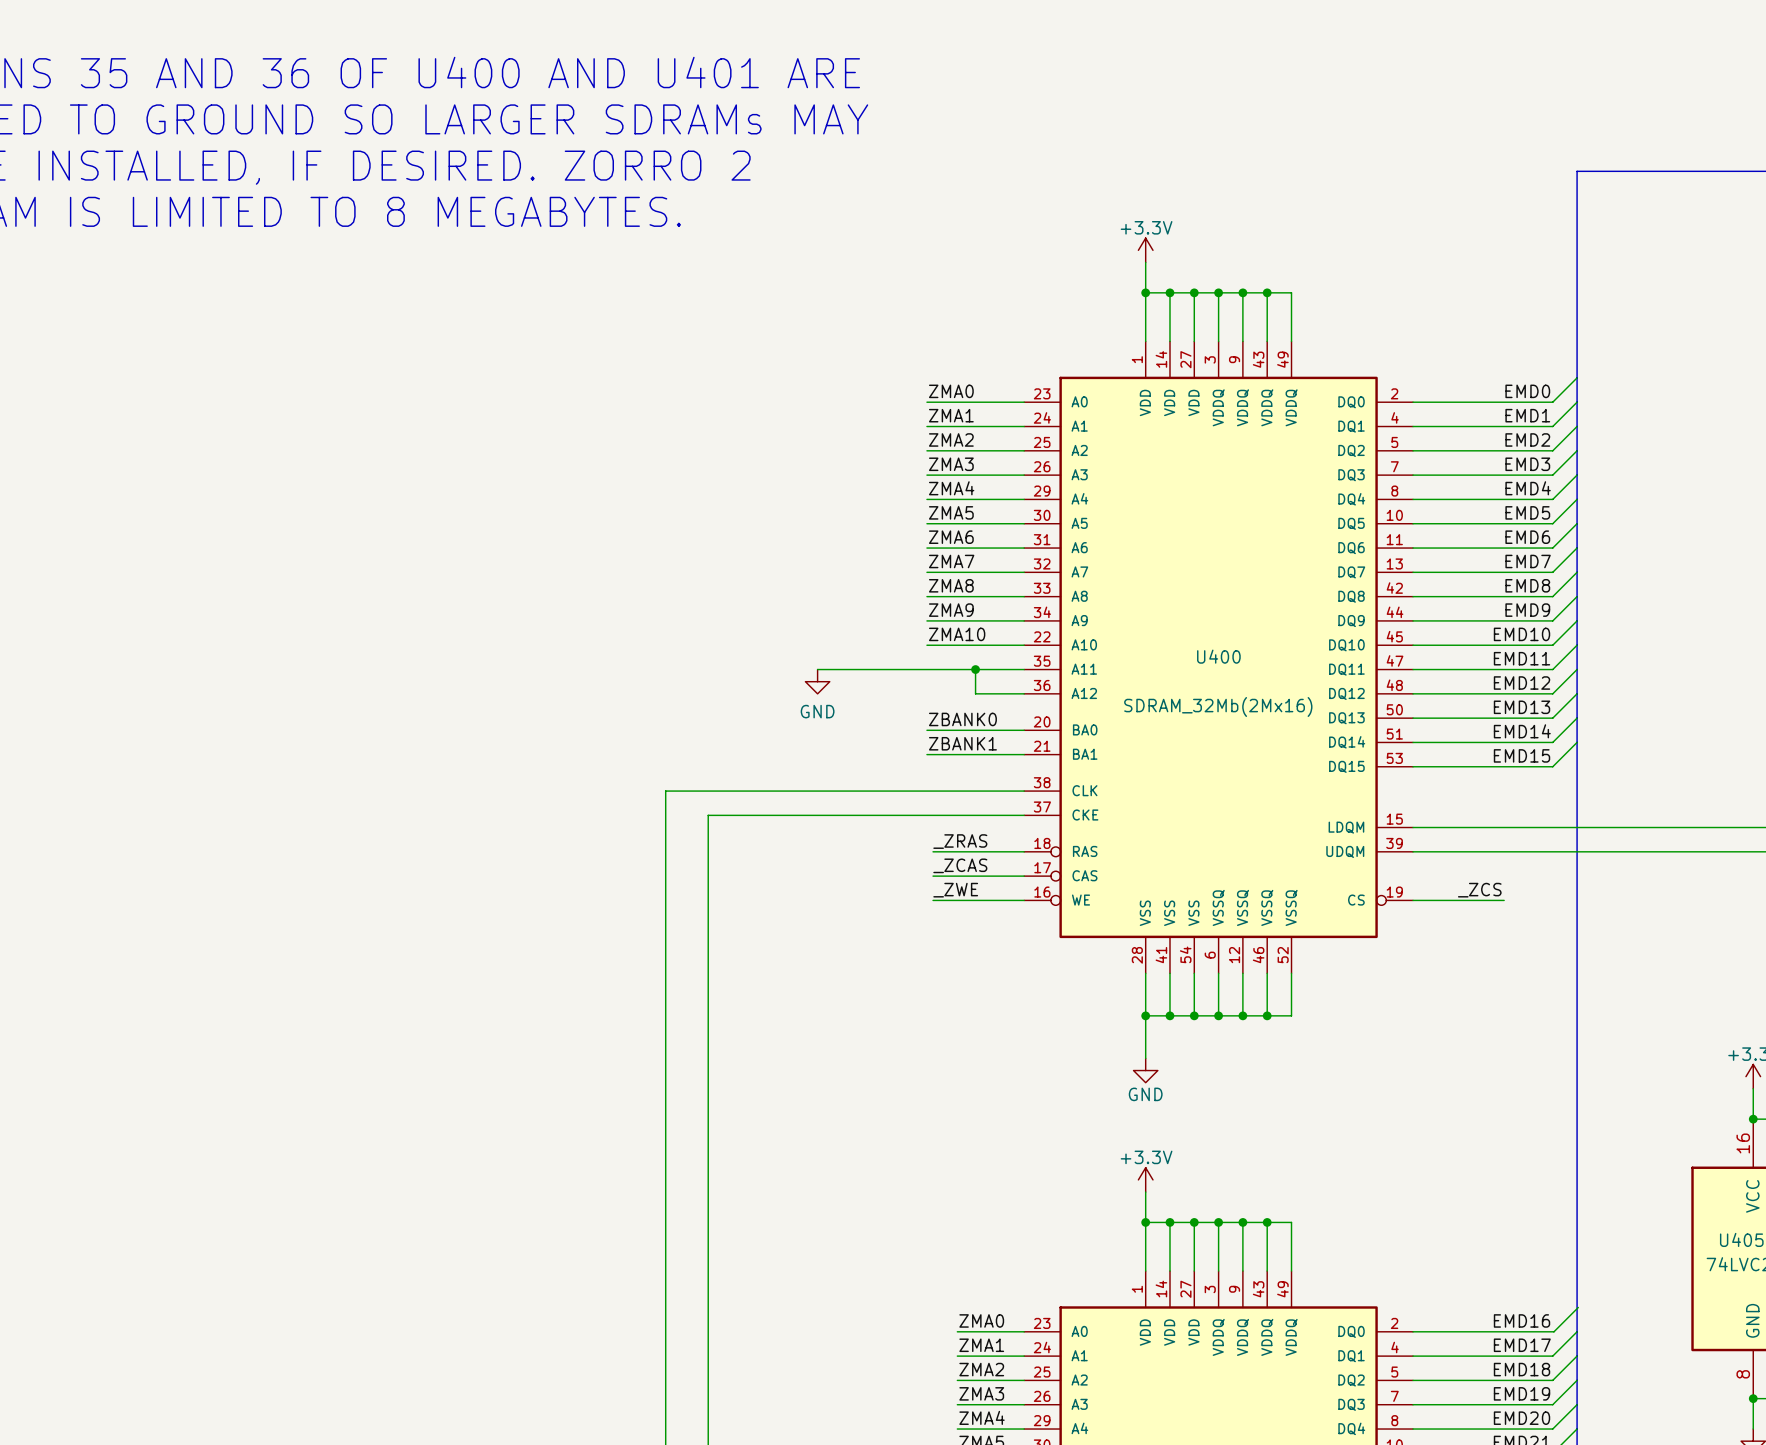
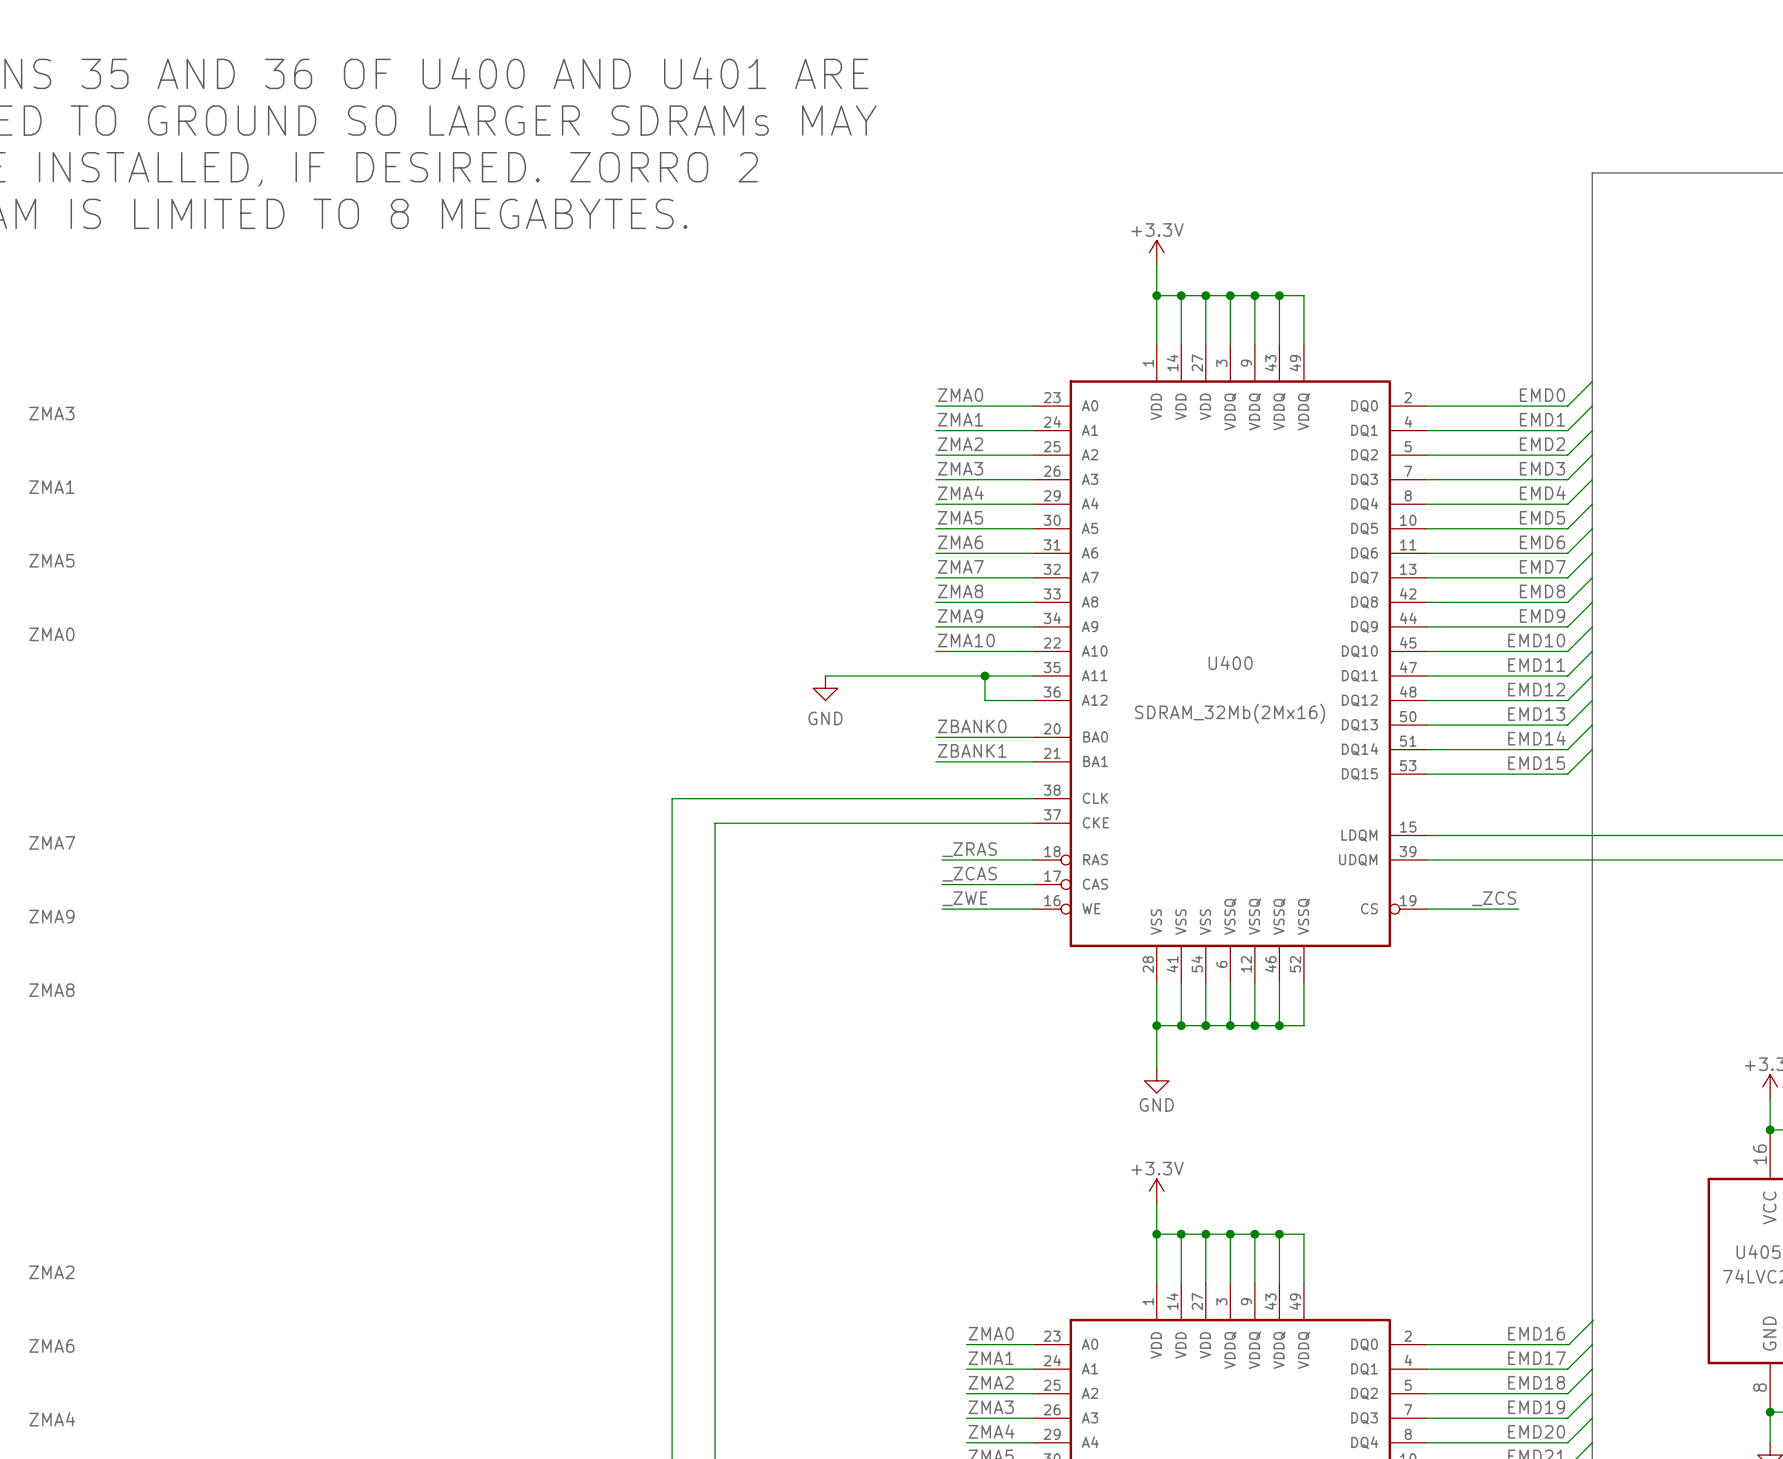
label: none -> ZMA3 (51, 413)
label: none -> ZMA1 (51, 487)
label: none -> ZMA5 (51, 560)
label: none -> ZMA0 (51, 634)
label: none -> ZMA7 (52, 842)
label: none -> ZMA9 (51, 916)
label: none -> ZMA8 (51, 990)
label: none -> ZMA2 (51, 1272)
label: none -> ZMA6 (51, 1345)
label: none -> ZMA4 (52, 1419)

